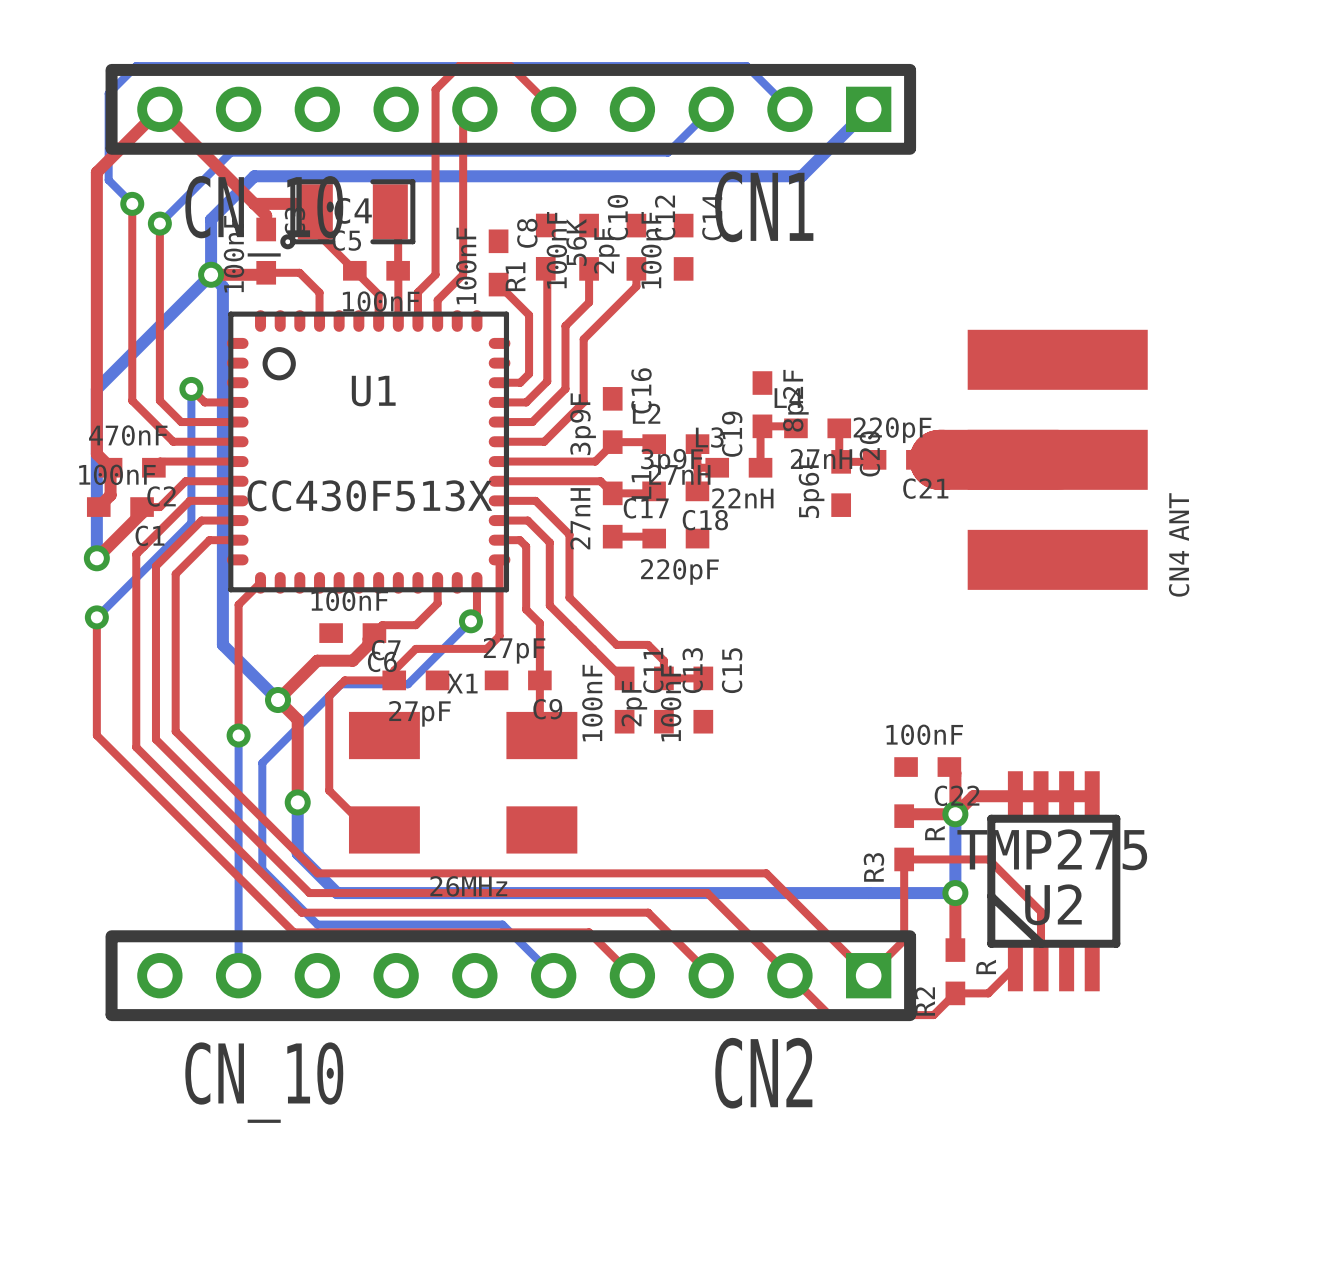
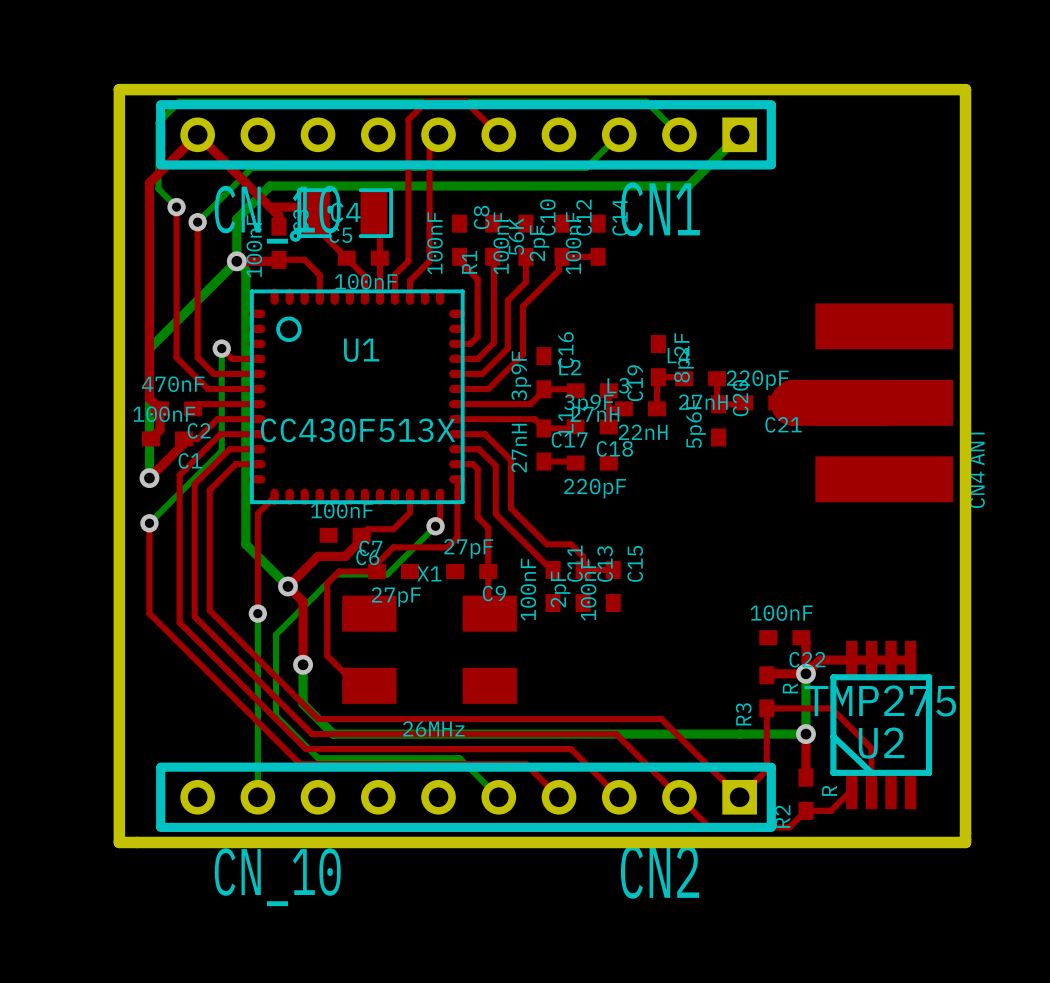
board edge: none -> (119, 89) (119, 842) (965, 842) (965, 89) (119, 89)
C8 position: (498, 262) -> (459, 240)
top track: (636, 268) (636, 286) (583, 339) (583, 402) (544, 441) (540, 441) -> (592, 256) (558, 256) (558, 270) (522, 306) (522, 354) (488, 388)
top track: (498, 284) (529, 315) (529, 373) (520, 382) (516, 382) -> (459, 256) (459, 261) (477, 279) (477, 336) (470, 343)

